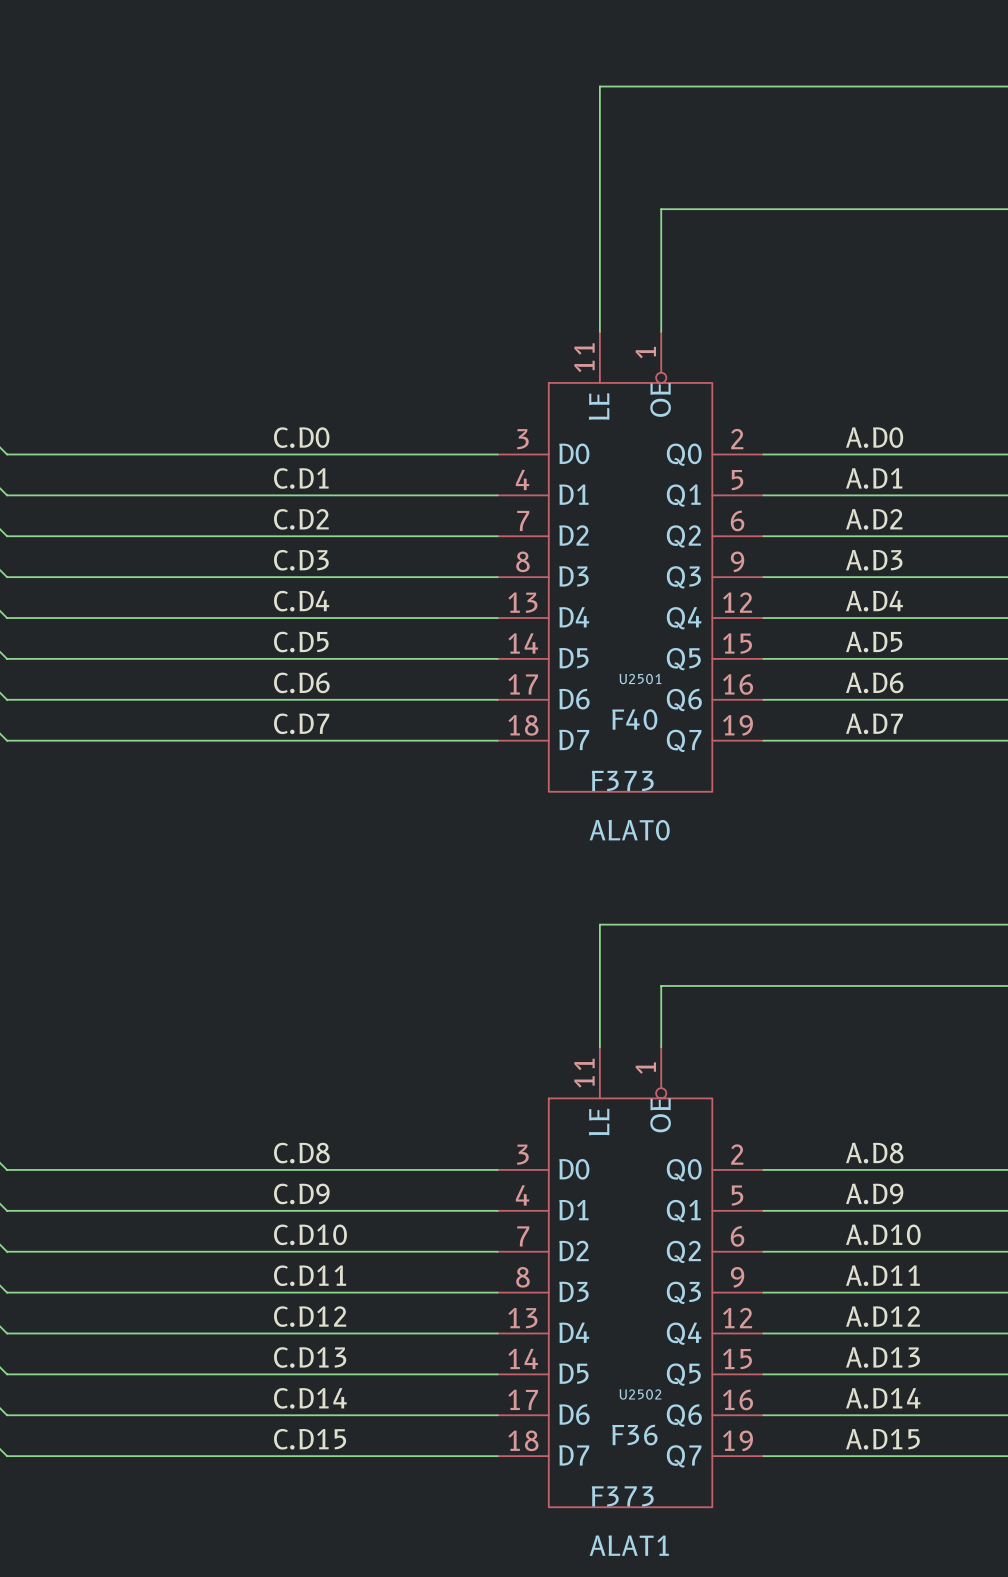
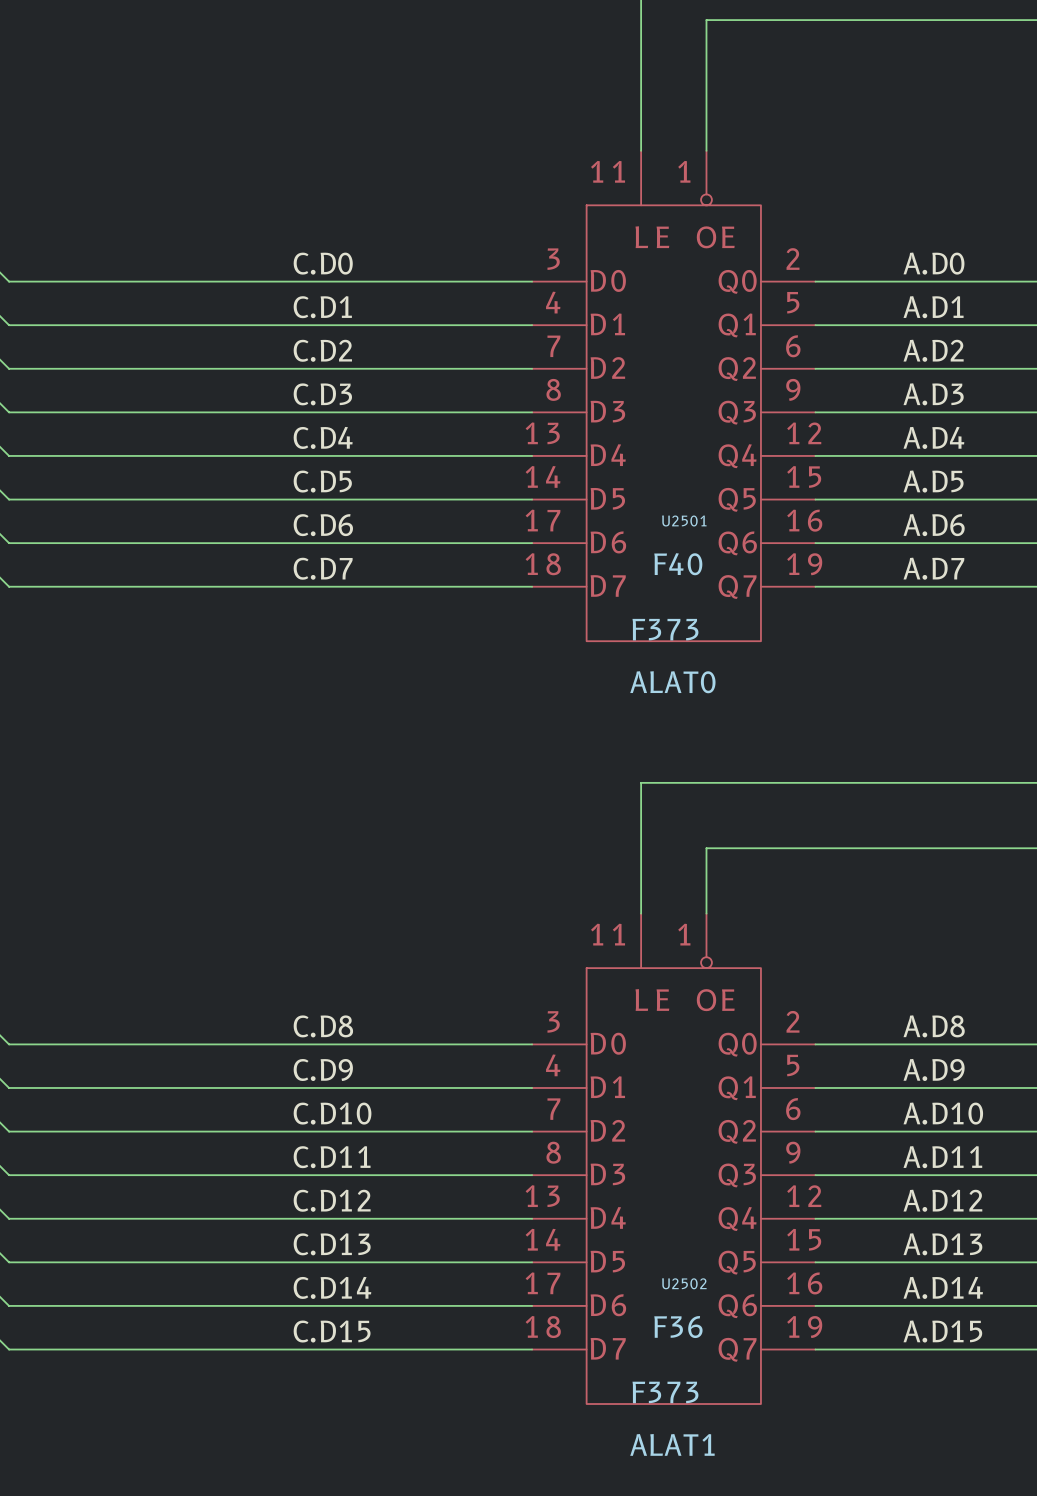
U2501 symbol: [497, 331, 764, 792] -> [532, 150, 816, 642]
U2502 symbol: [497, 1047, 764, 1508] -> [532, 913, 816, 1405]

